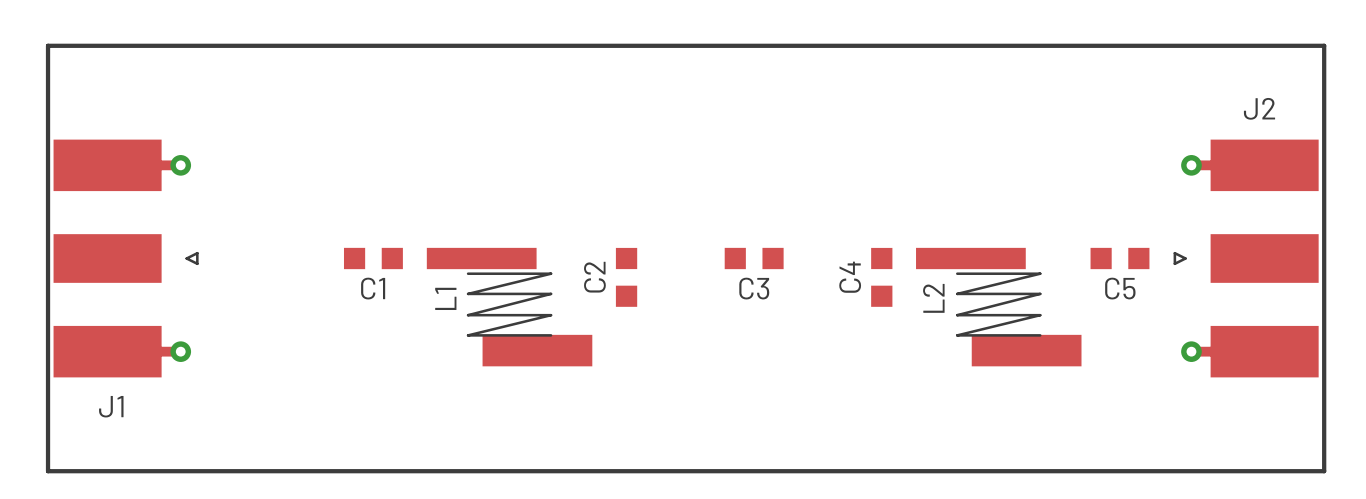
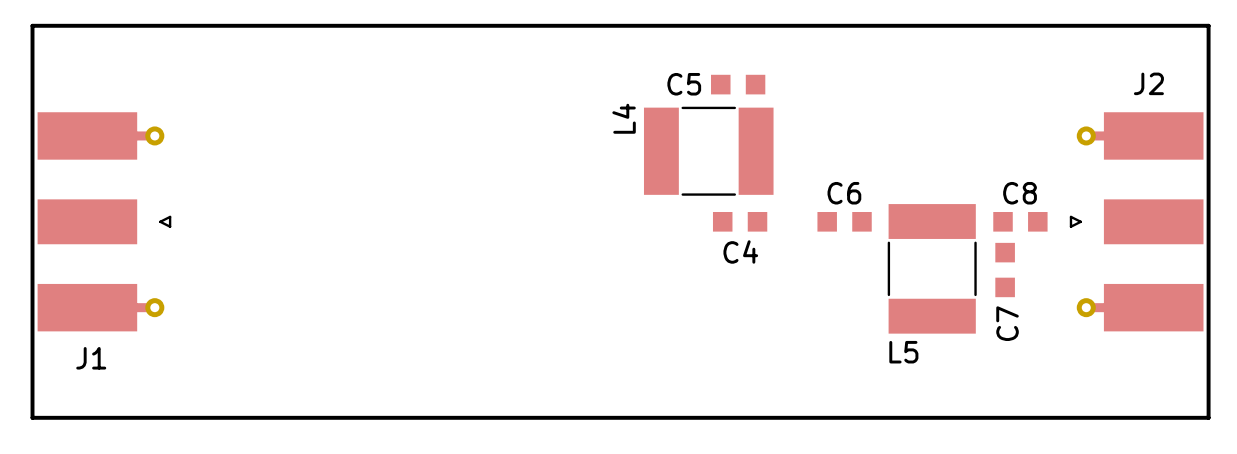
C5: none -> (738, 84)
L4: none -> (708, 151)
C1: (373, 258) -> none
C3: (754, 258) -> none
C6: none -> (844, 221)
C2: (626, 277) -> none
C4 name position: C4 (850, 277) -> C4 (740, 251)
C4 rotation: 0° (881, 277) -> 90° clockwise (740, 221)
C4 position: (881, 277) -> (740, 221)
C5 name: C5 (1120, 288) -> C8 (1020, 193)
L1: (509, 307) -> none
L2: (998, 307) -> none
L5: none -> (932, 268)
C7: none -> (1005, 270)

